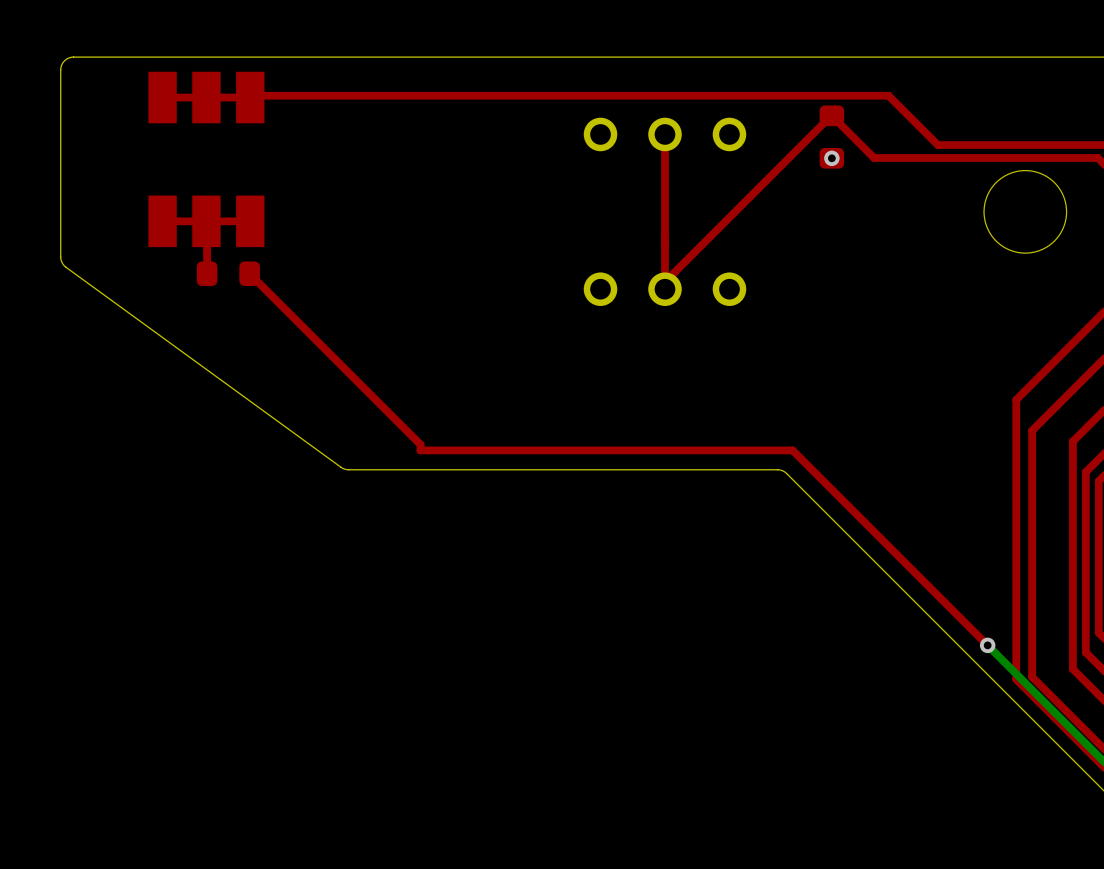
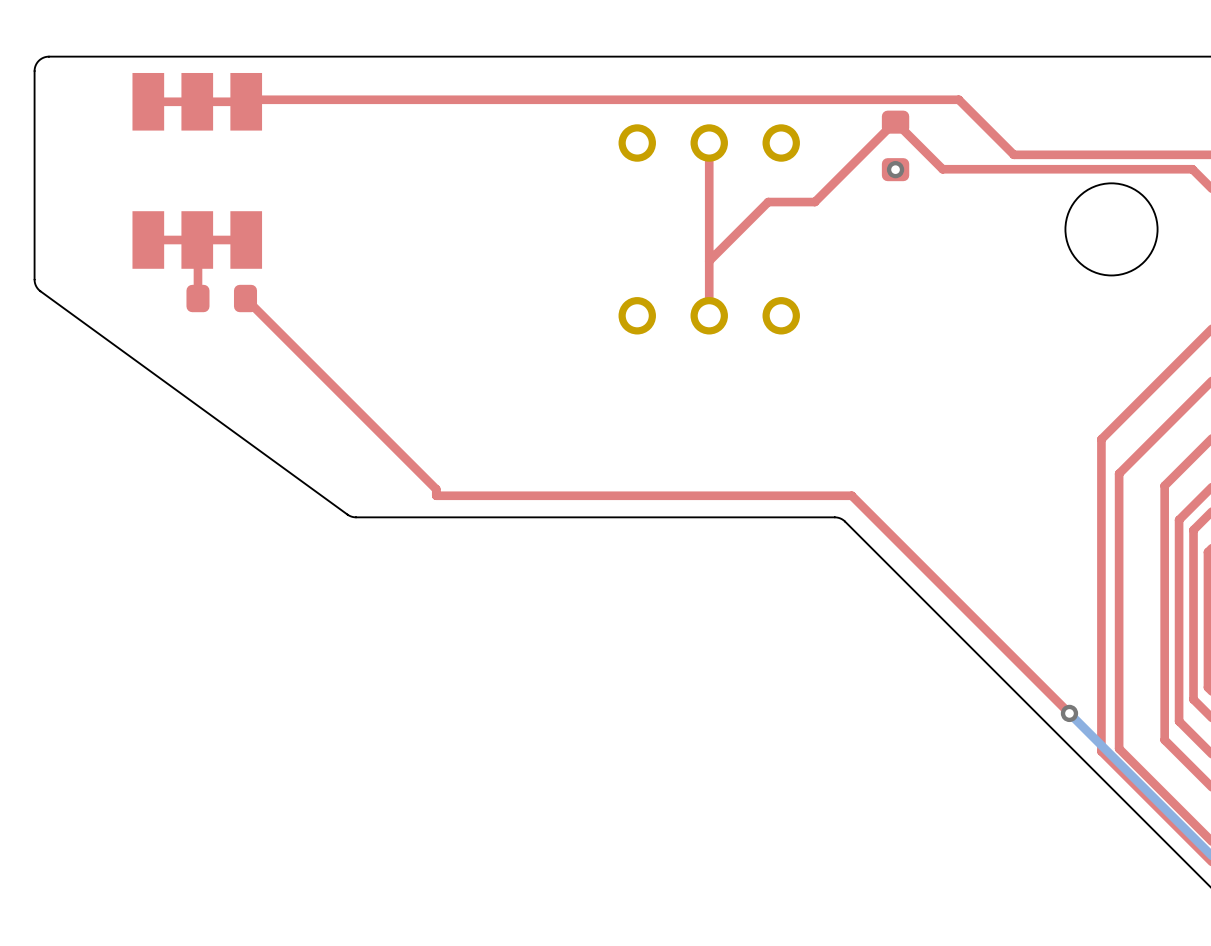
top track: (759, 187) (665, 281) -> (814, 202) (768, 202) (709, 261)

